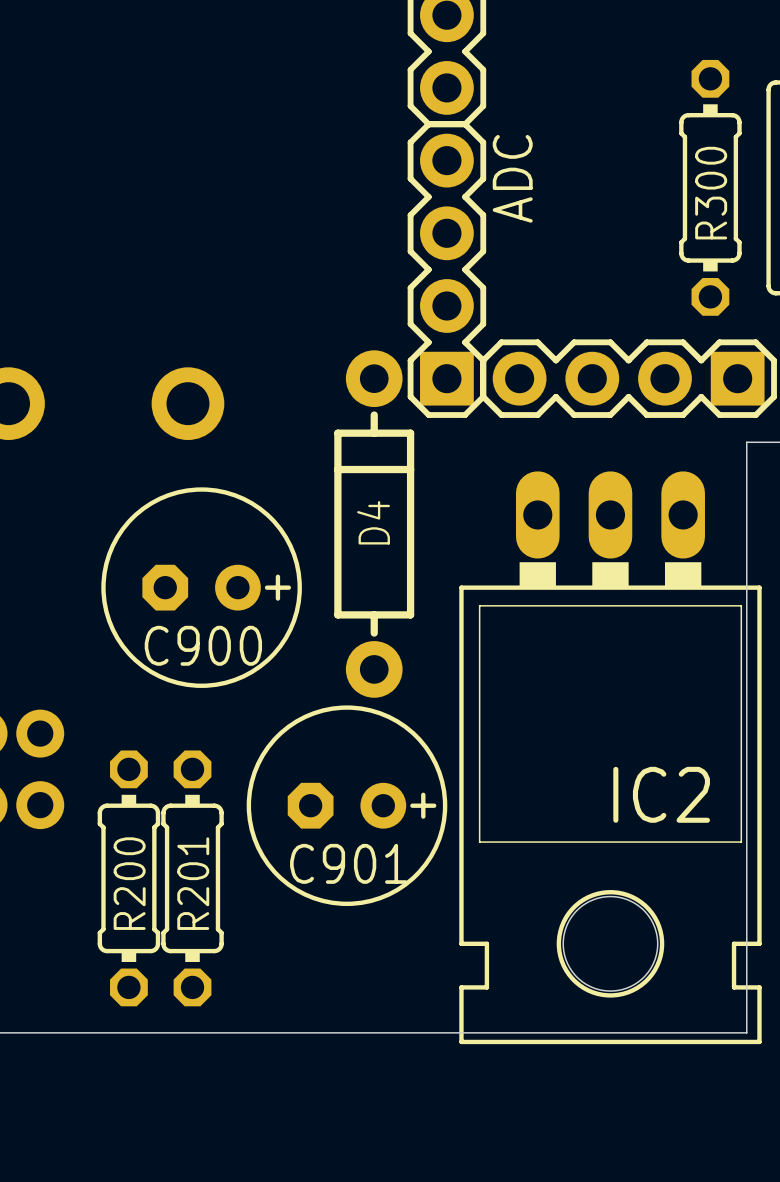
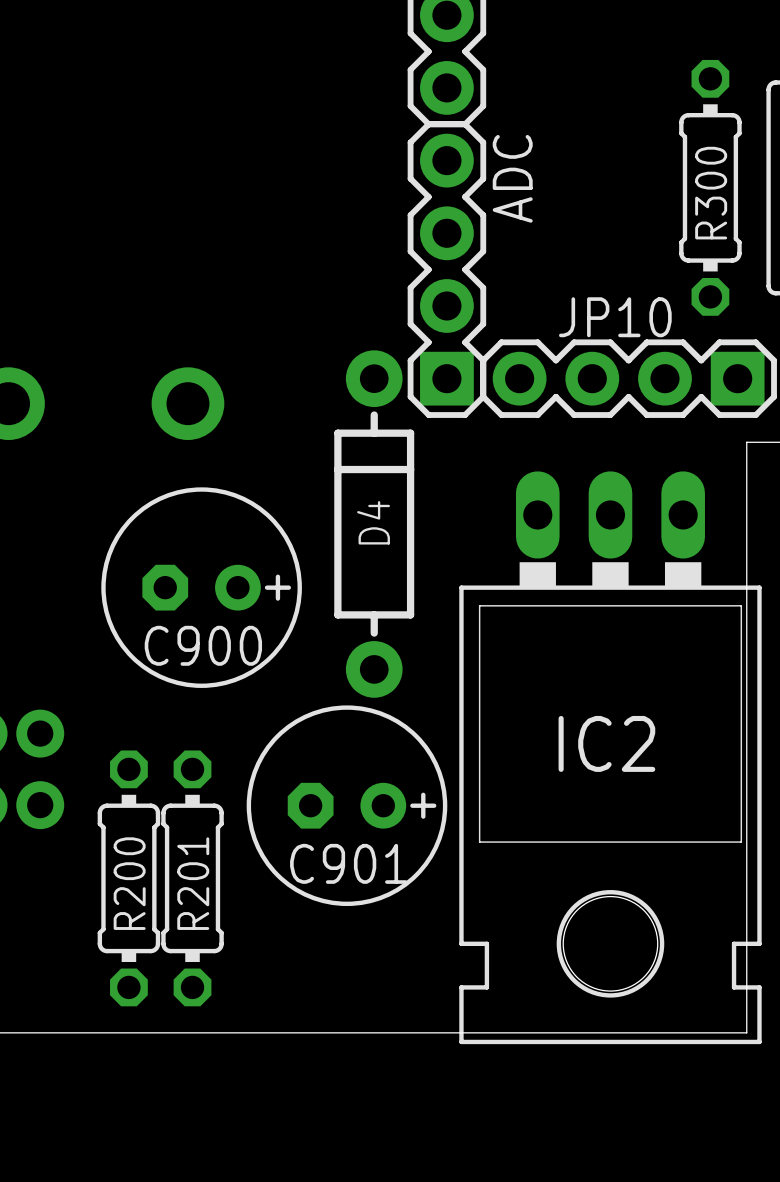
JP10 name: none -> JP10 (615, 317)
IC2 name position: IC2 (661, 794) -> IC2 (606, 743)

